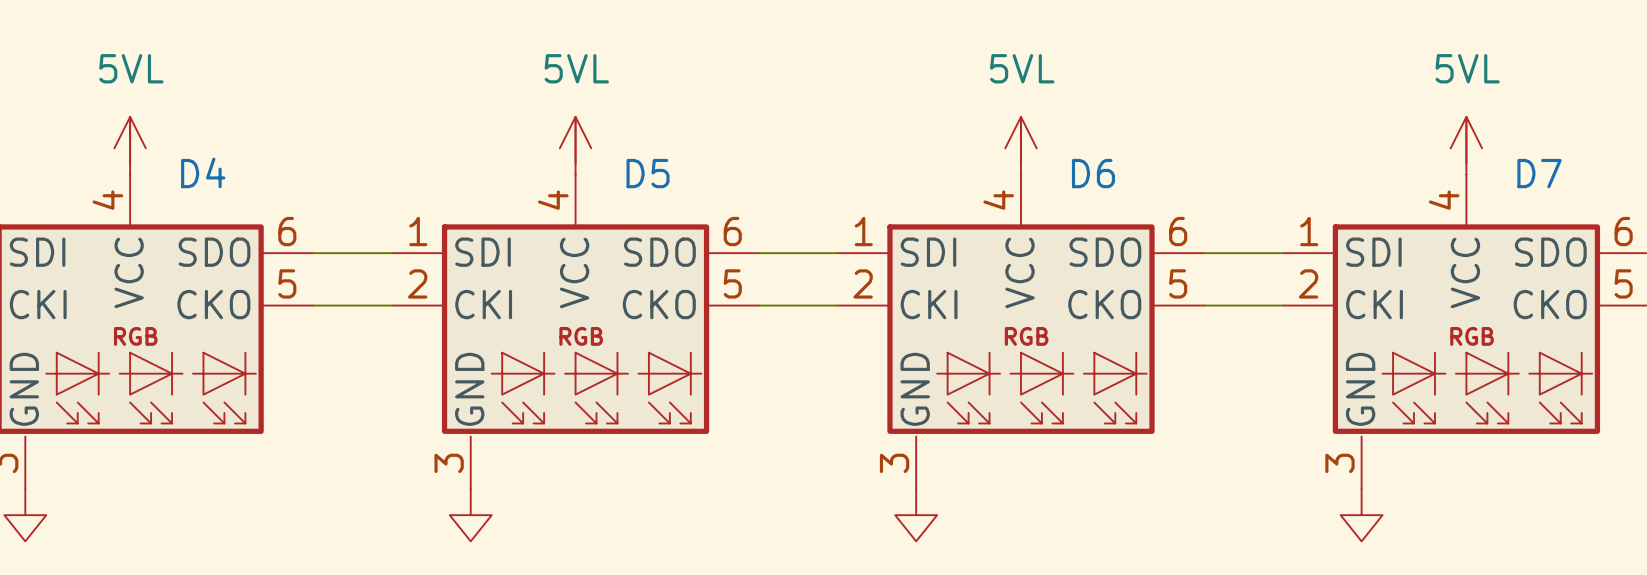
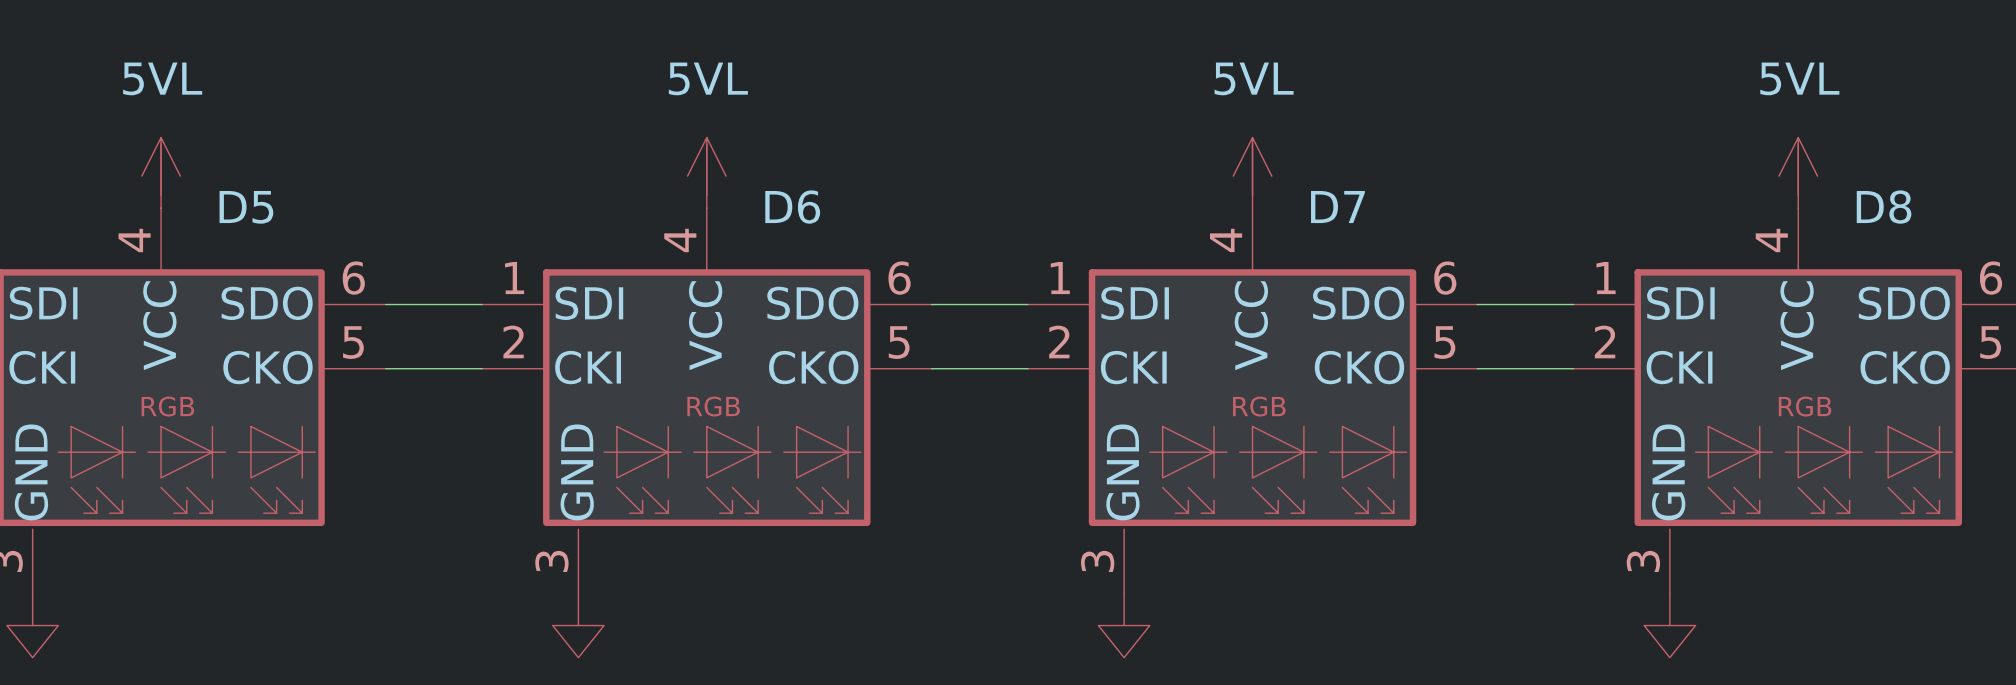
D4 name: D4 (203, 172) -> D5 (246, 207)
D5 name: D5 (648, 173) -> D6 (792, 207)
D6 name: D6 (1093, 173) -> D7 (1337, 207)
D7 name: D7 (1539, 173) -> D8 (1884, 207)

